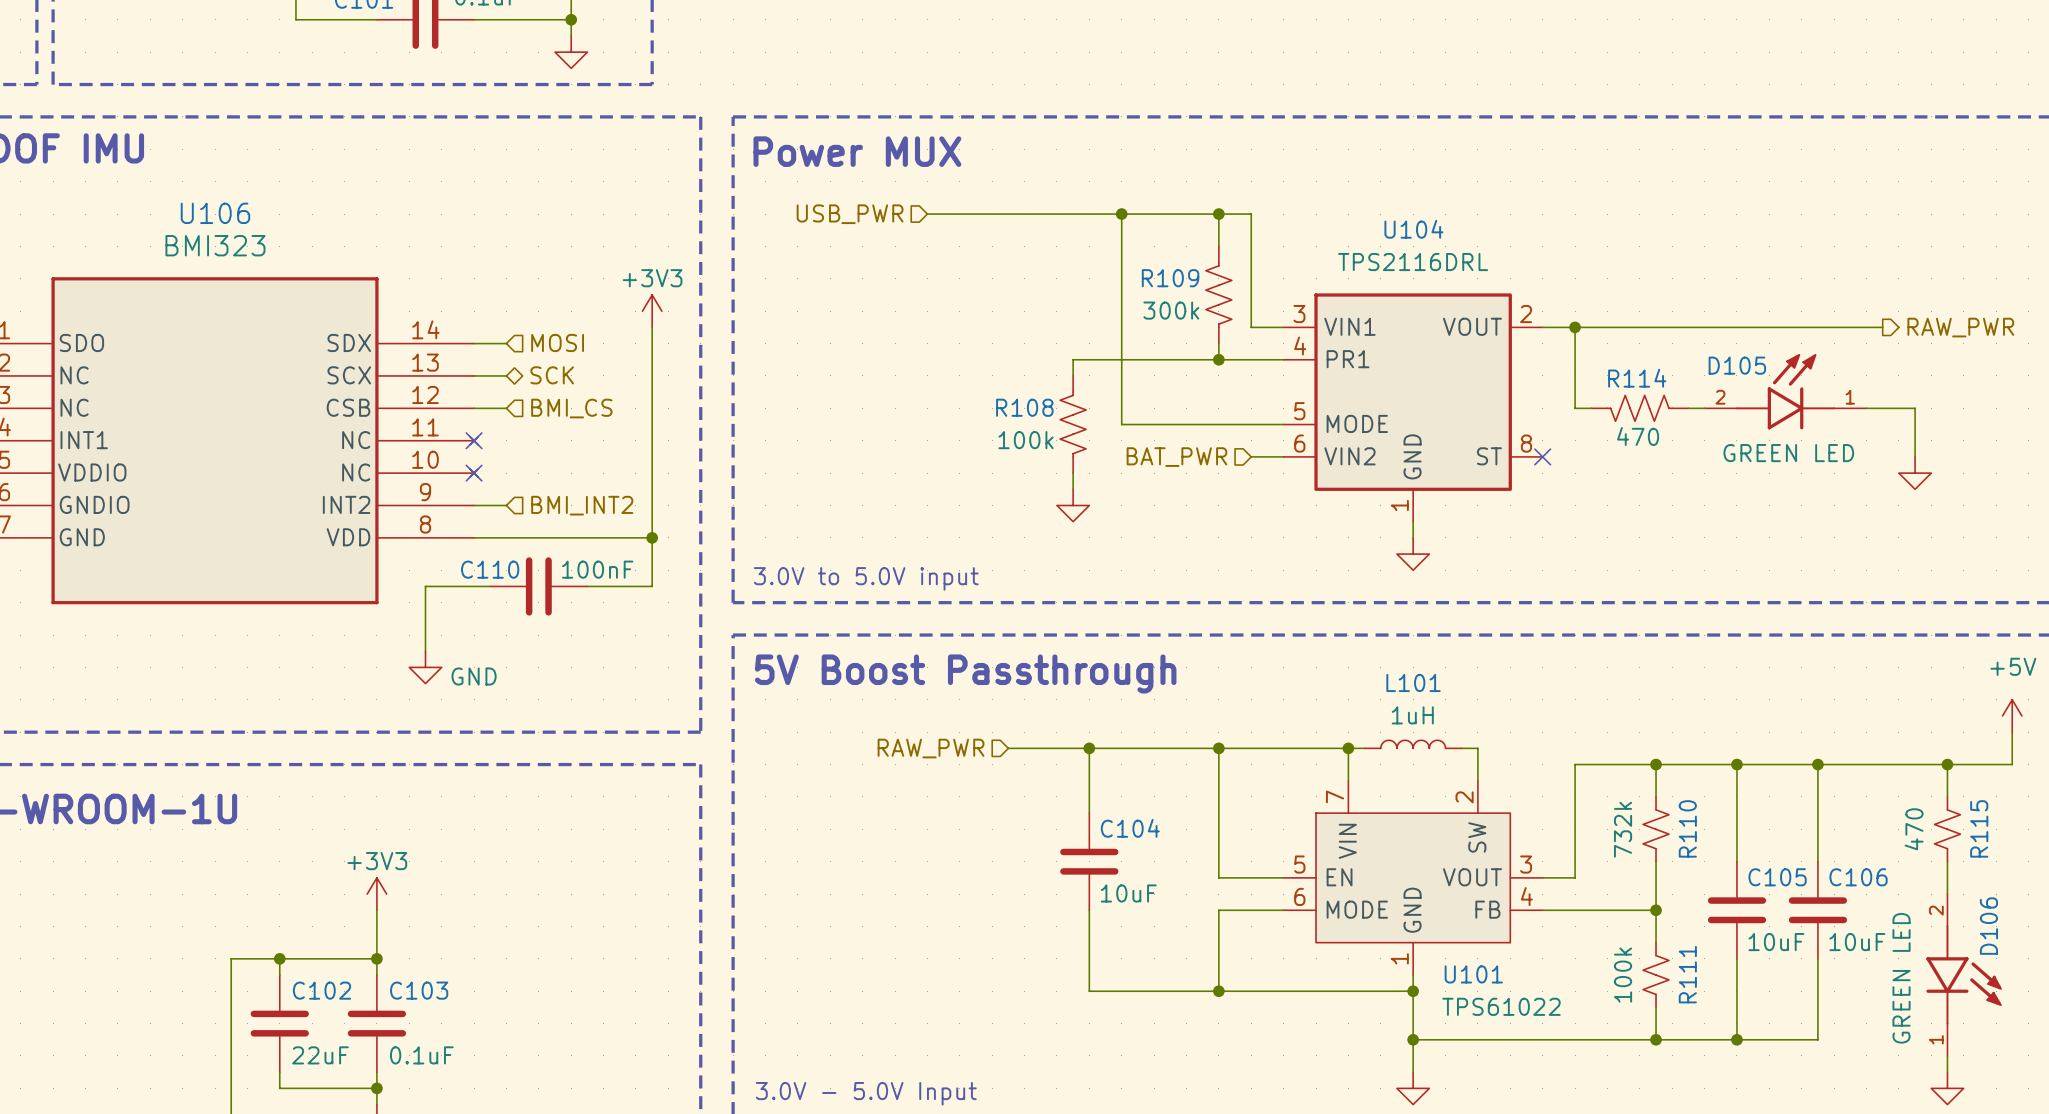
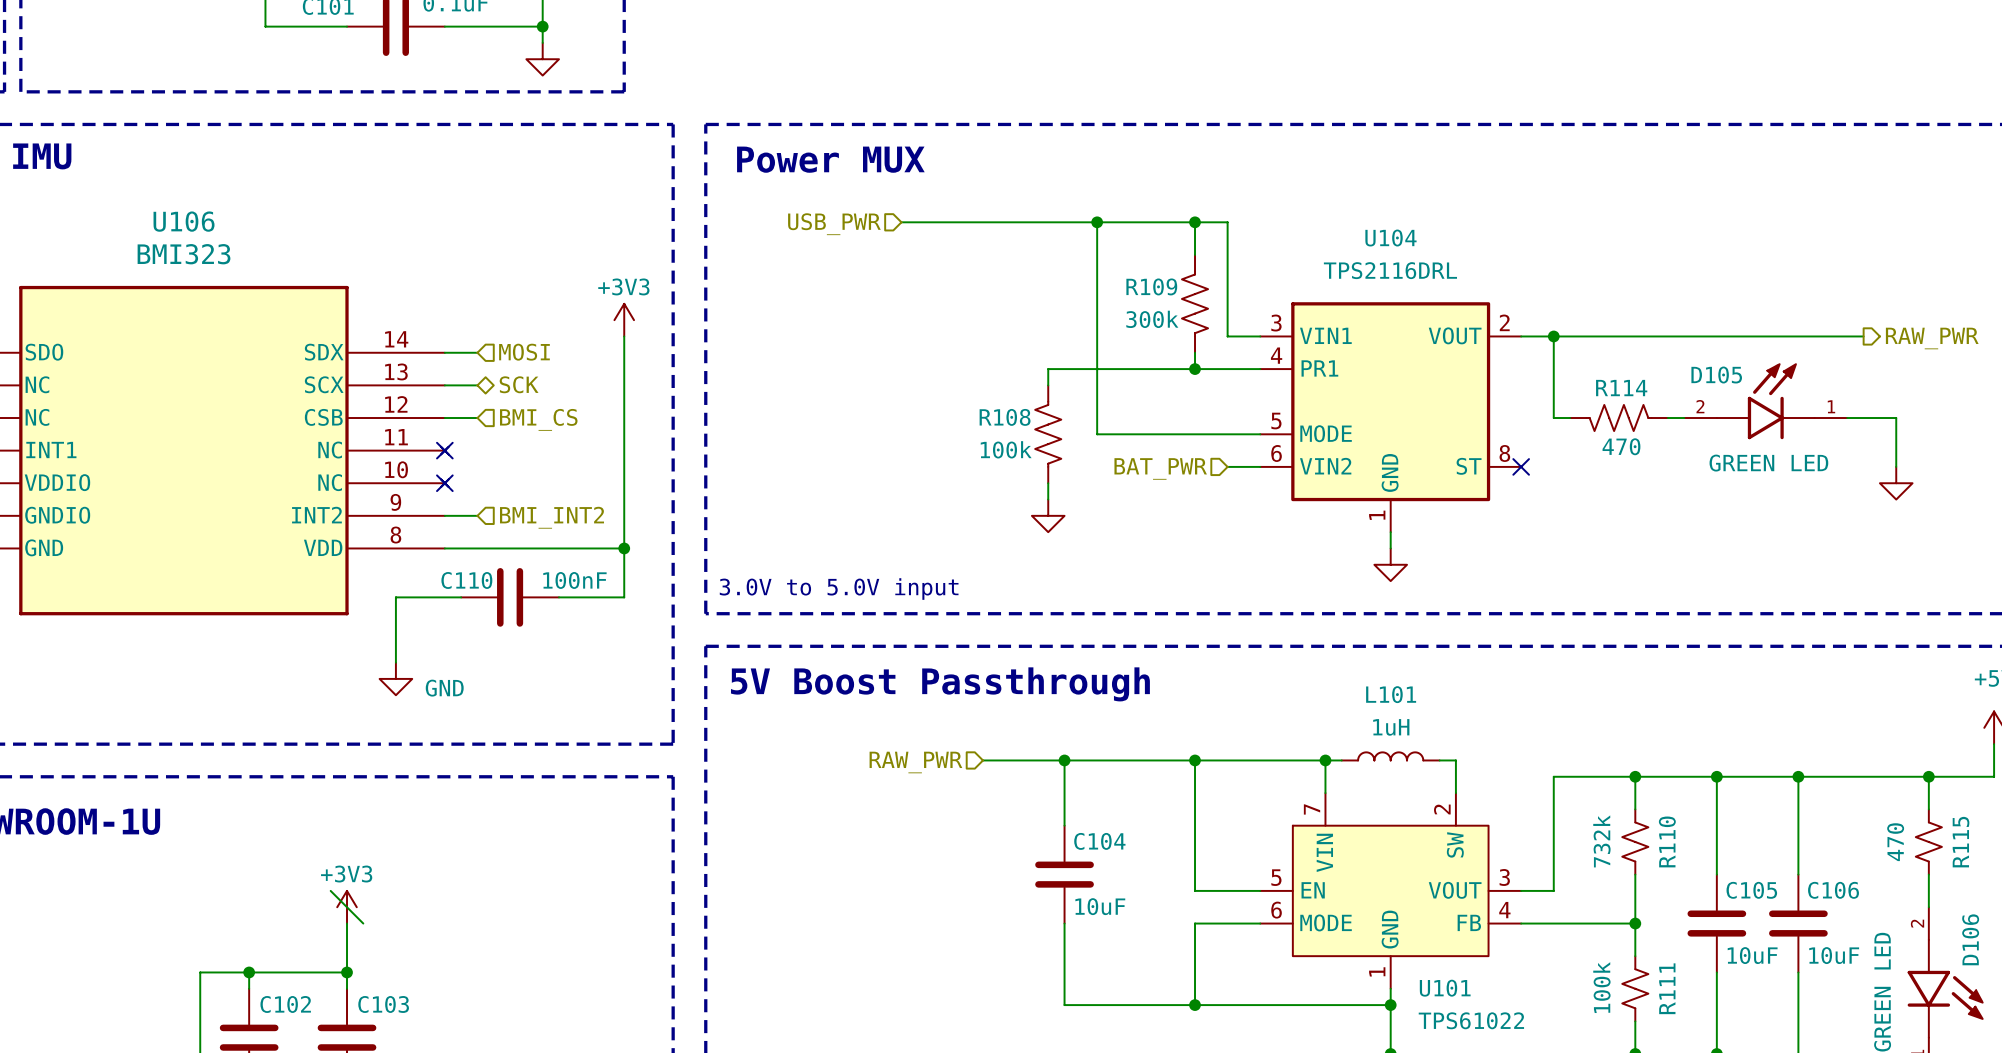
wire: none -> (330, 890) (363, 923)

